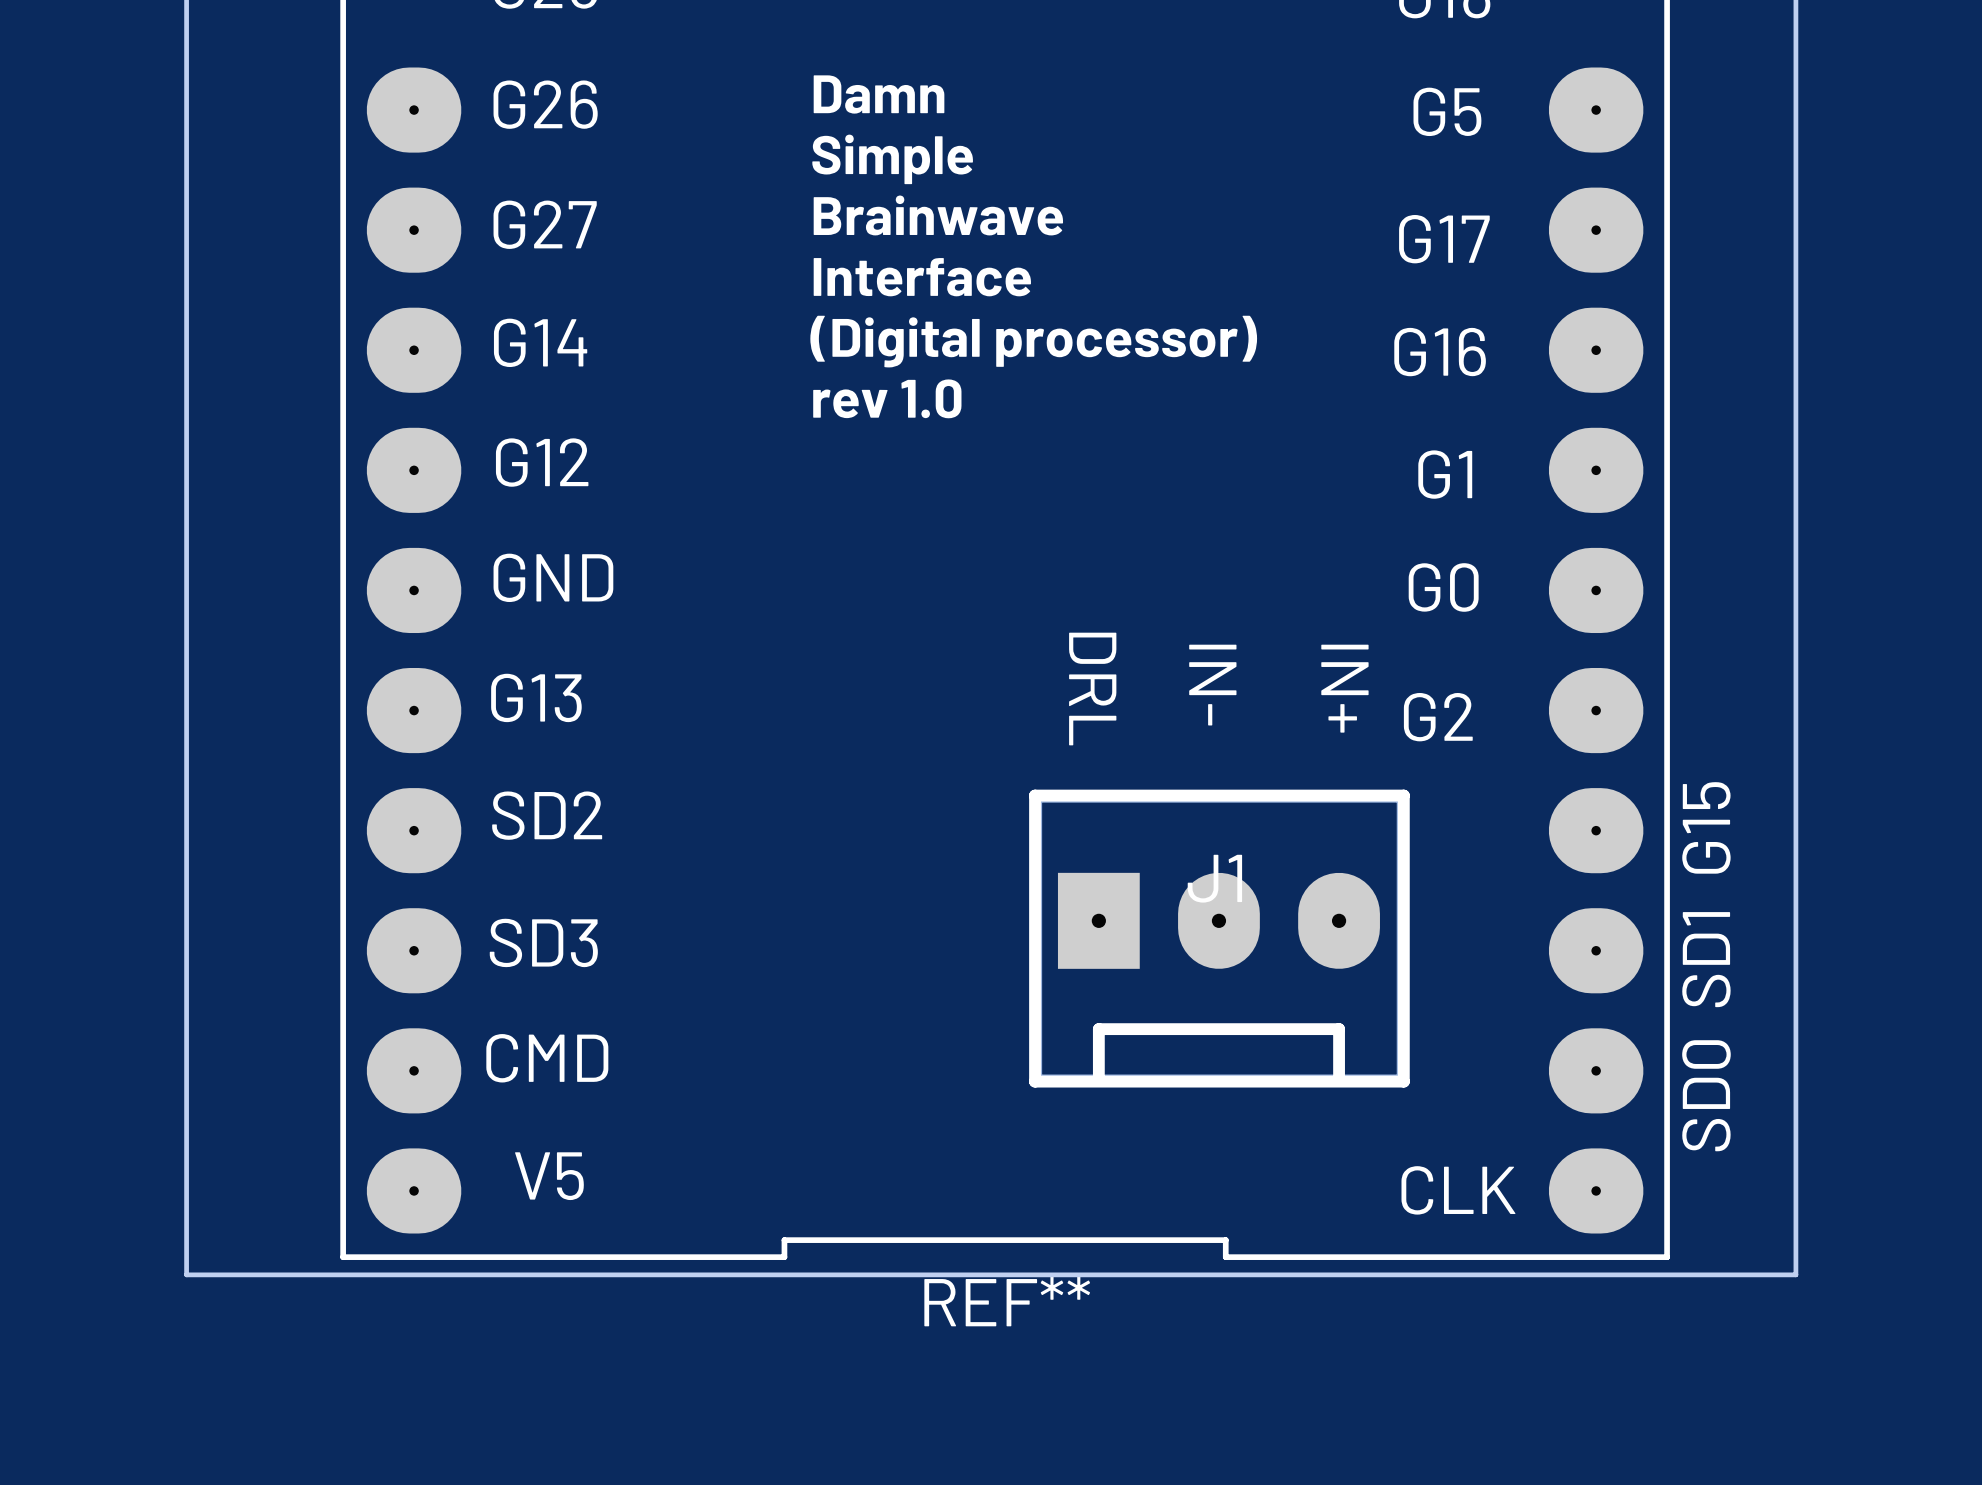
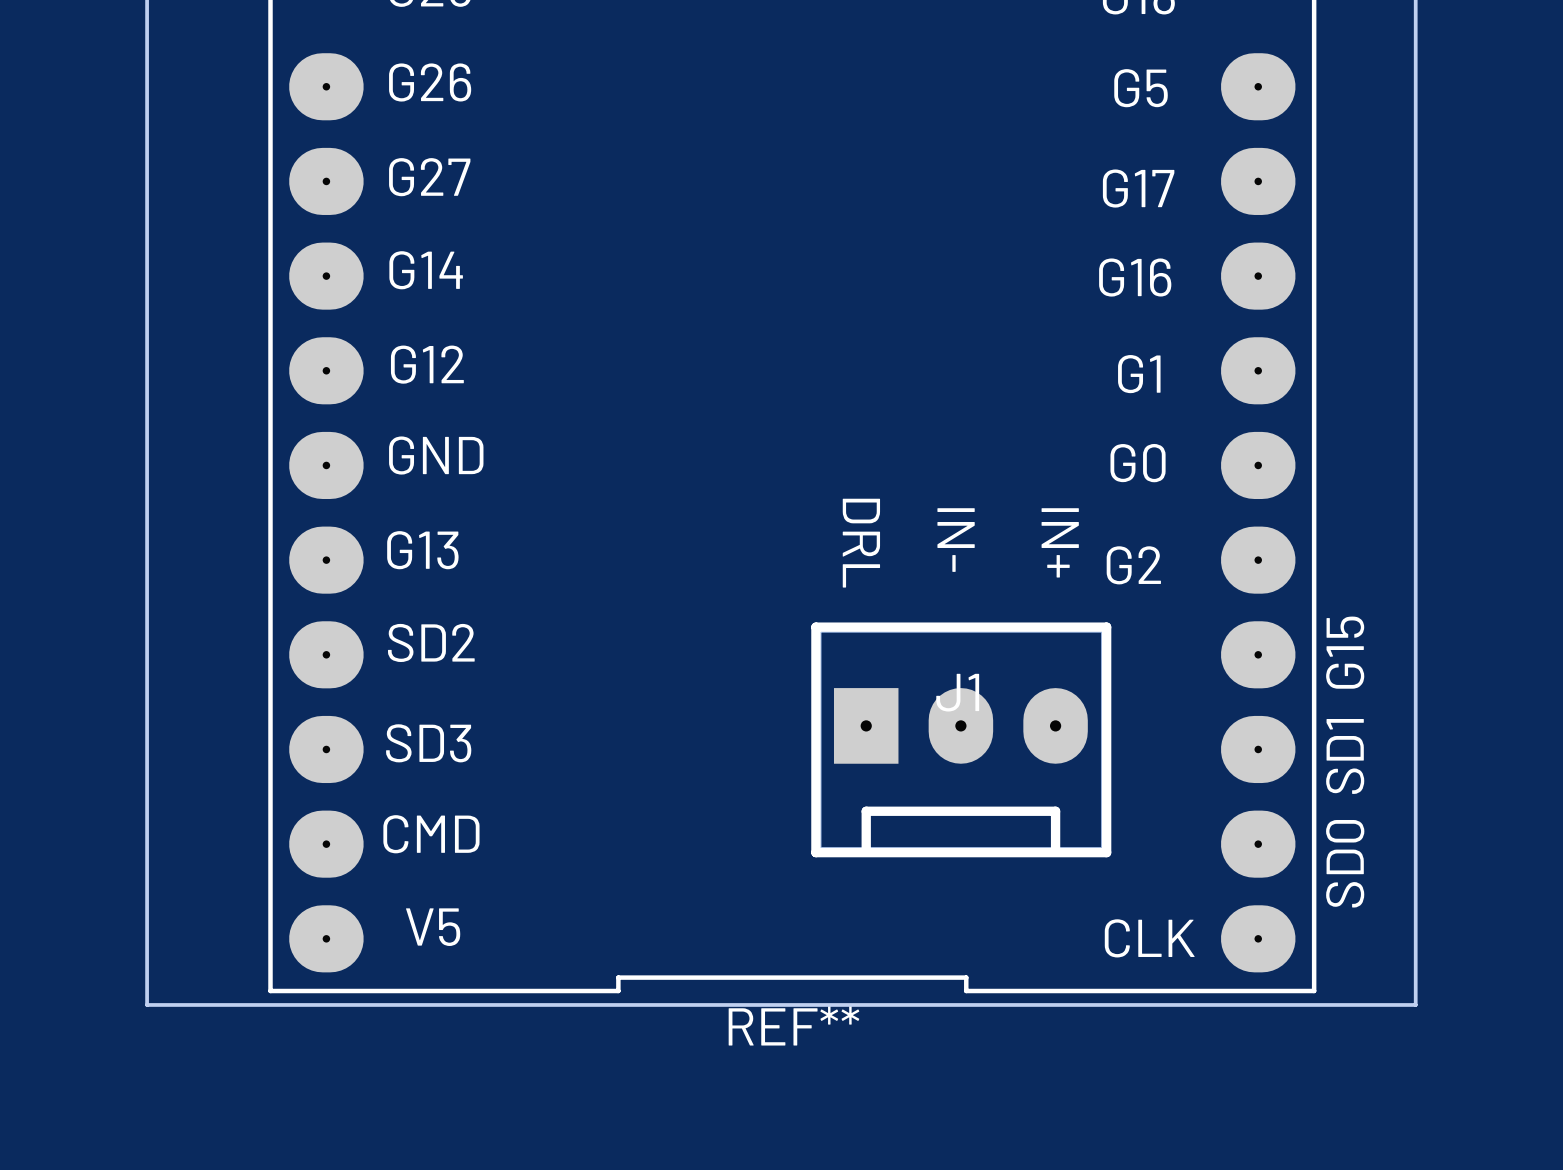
text: Damn (879, 94) -> none
text: Simple (892, 159) -> none
text: Brainwave (938, 215) -> none
text: Interface (922, 277) -> none
text: (Digital processor) (1033, 341) -> none
text: rev 1.0 (887, 398) -> none

